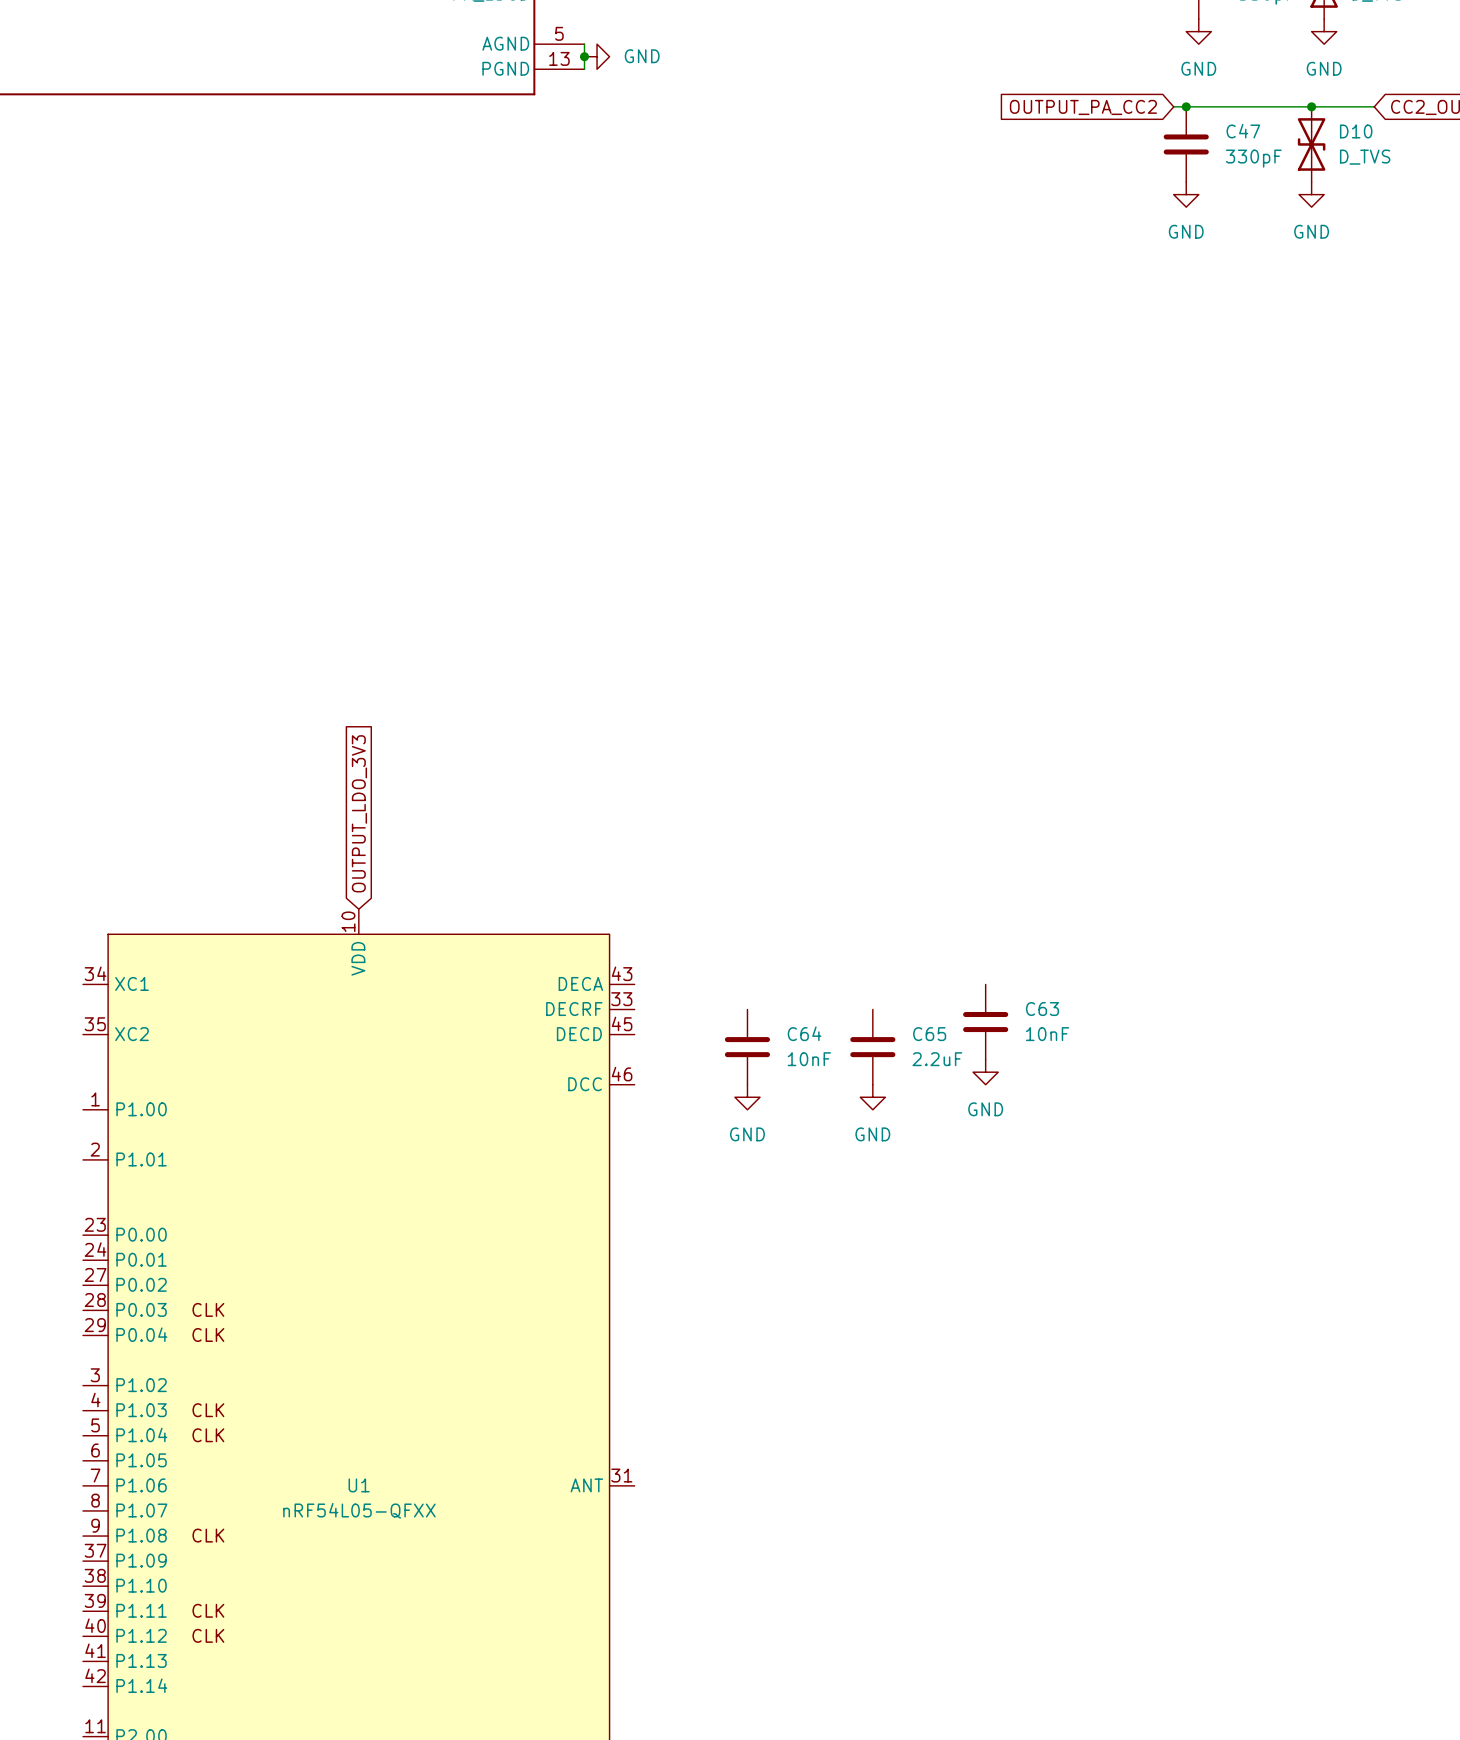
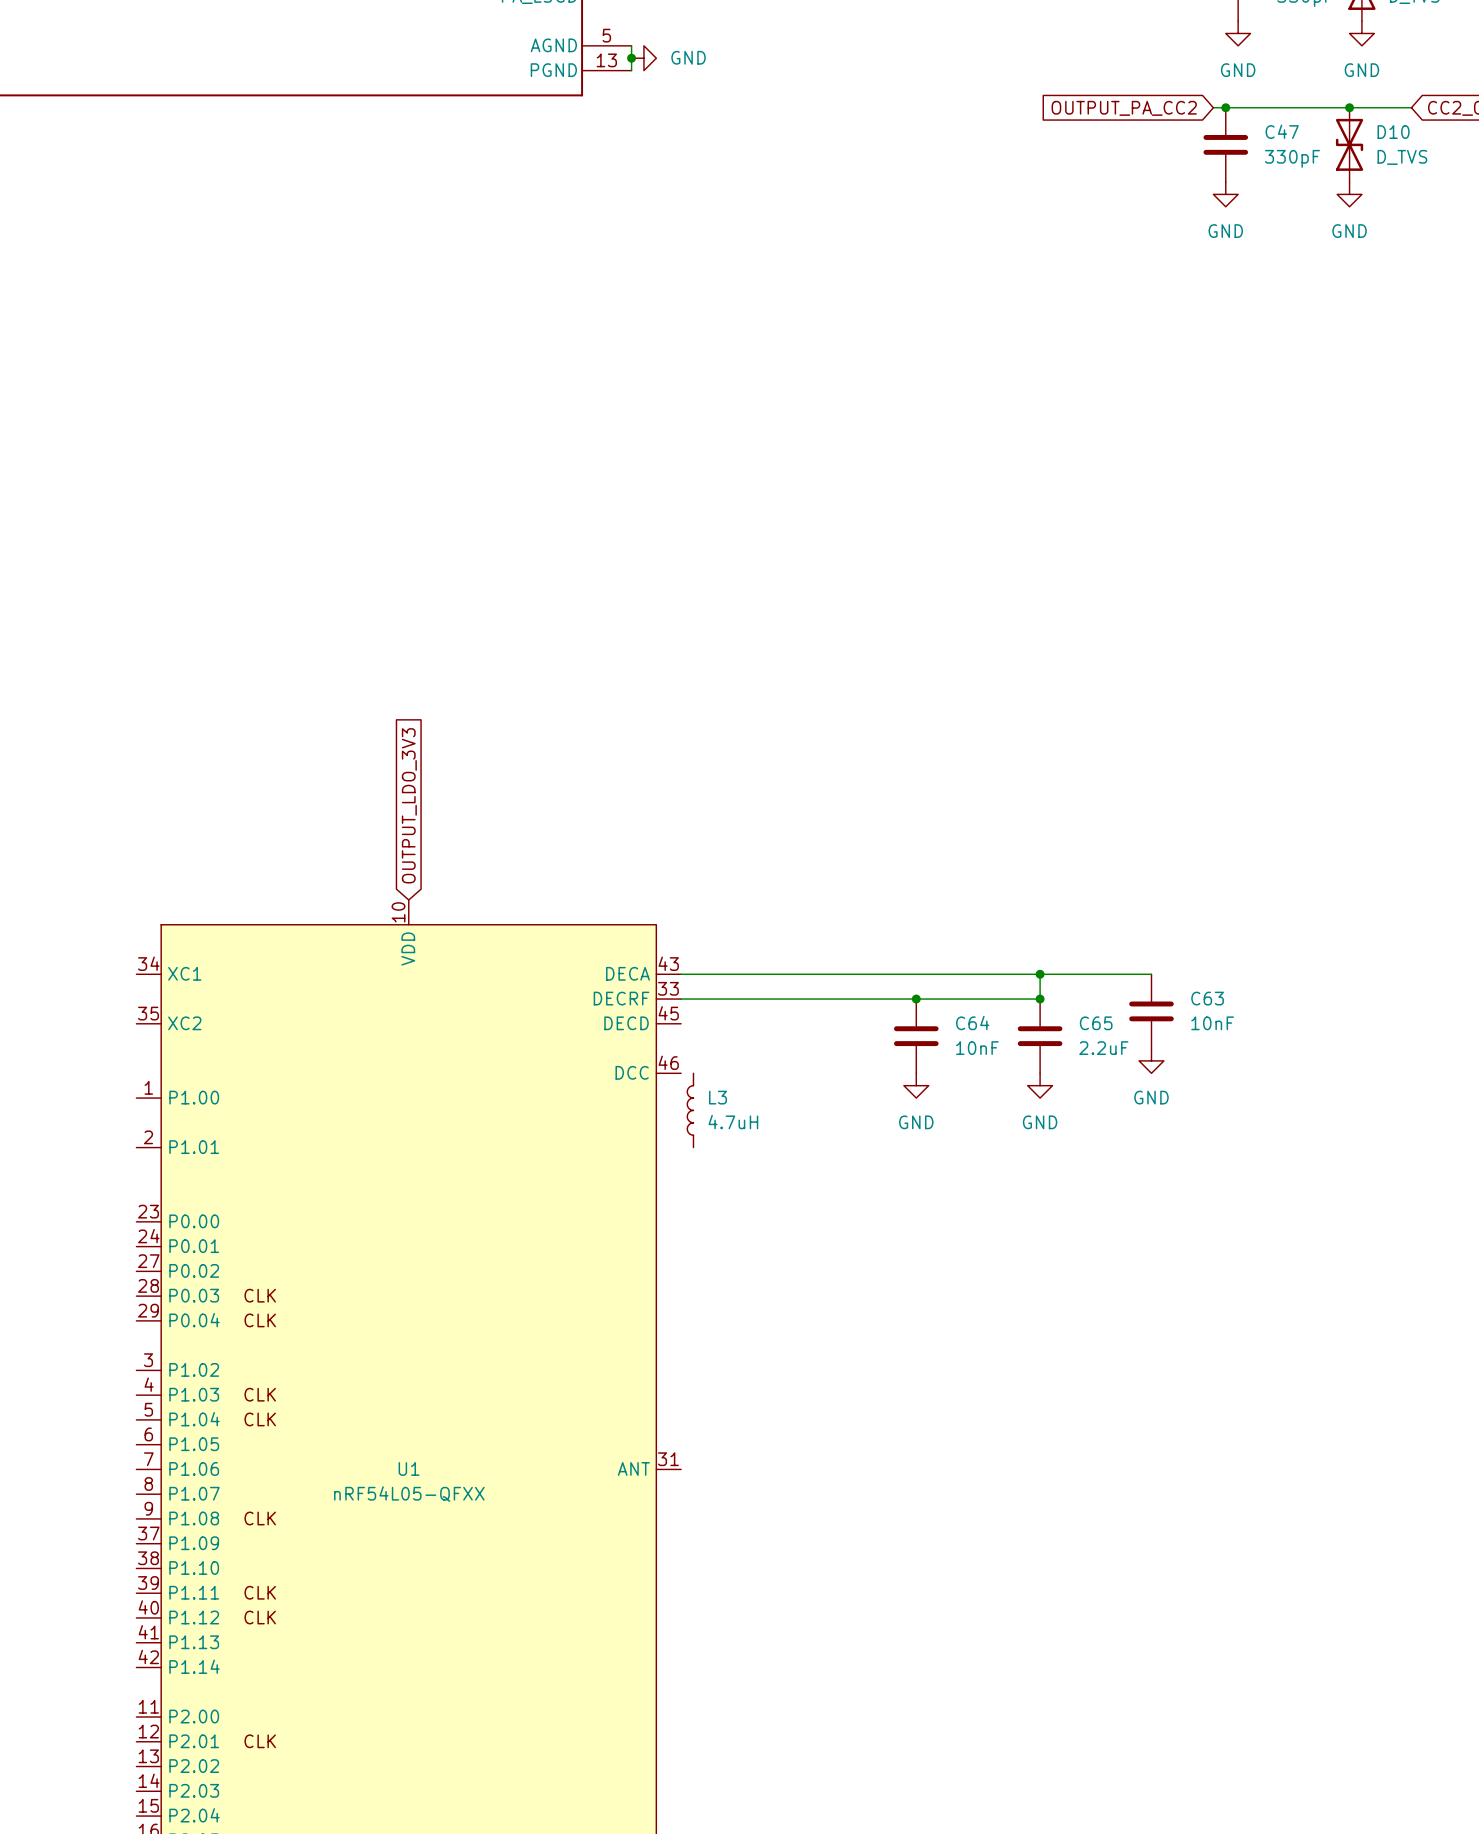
wire: none -> (681, 974) (1151, 974)
wire: none -> (1040, 974) (1040, 999) (681, 999)
junction: none -> (1040, 974)
junction: none -> (916, 999)
junction: none -> (1040, 999)
C63 position: (985, 1022) -> (1151, 1011)
C65 name: C65 (929, 1034) -> C64 (972, 1023)
C64: 10nF (747, 1047) -> none
C65: none -> 2.2uF (1040, 1036)
C65 value: 2.2uF (937, 1059) -> 10nF (977, 1048)
power symbol position: GND (985, 1072) -> GND (1040, 1085)
power symbol: none -> GND (1151, 1060)
power symbol: GND (747, 1097) -> none
L3: none -> 4.7uH (690, 1110)

